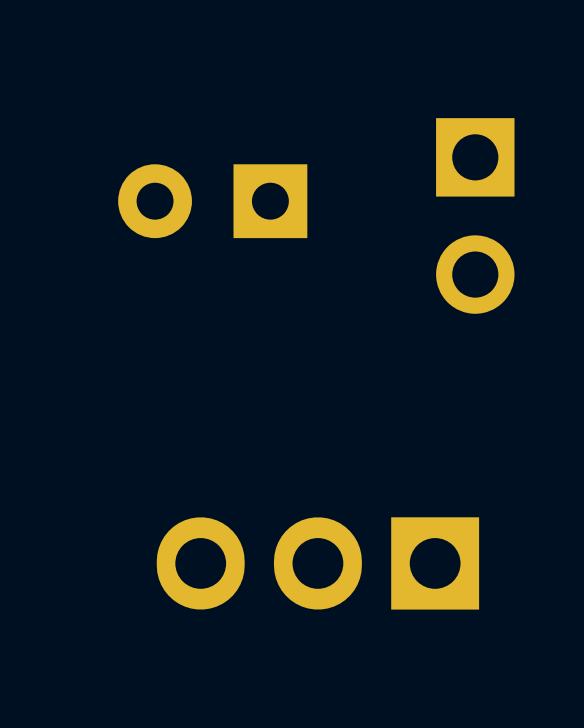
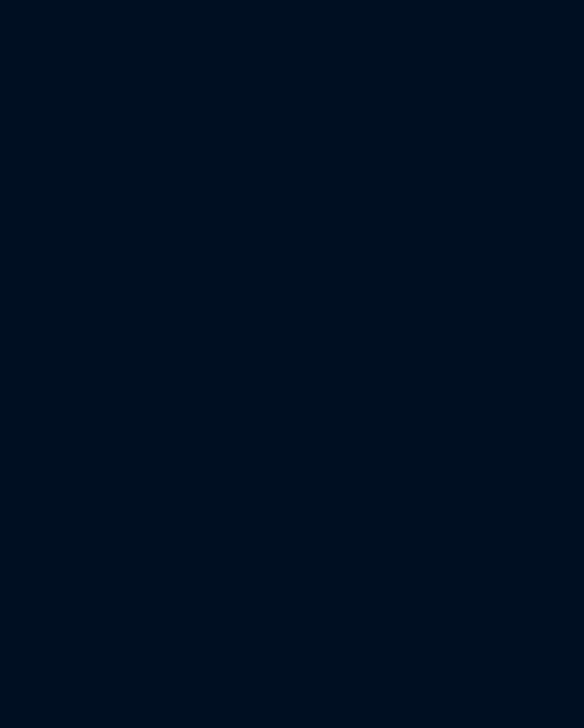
part: (212, 201) -> none
part: (475, 215) -> none
part: (317, 563) -> none

